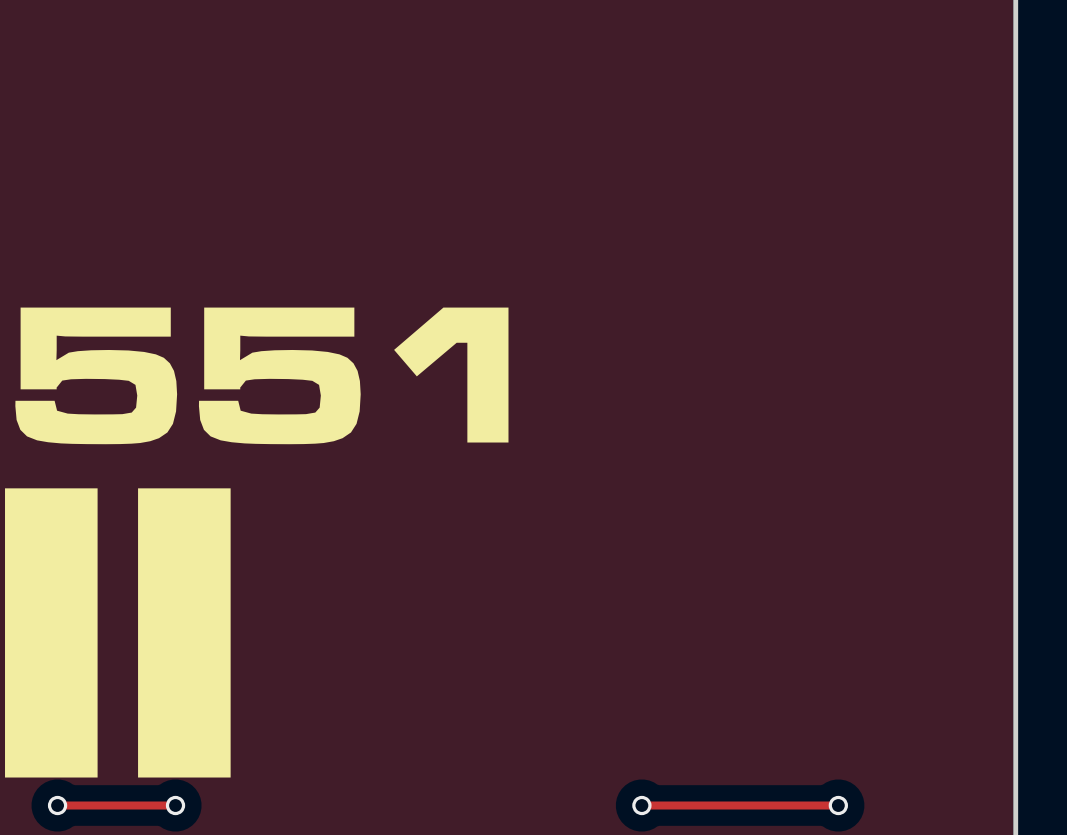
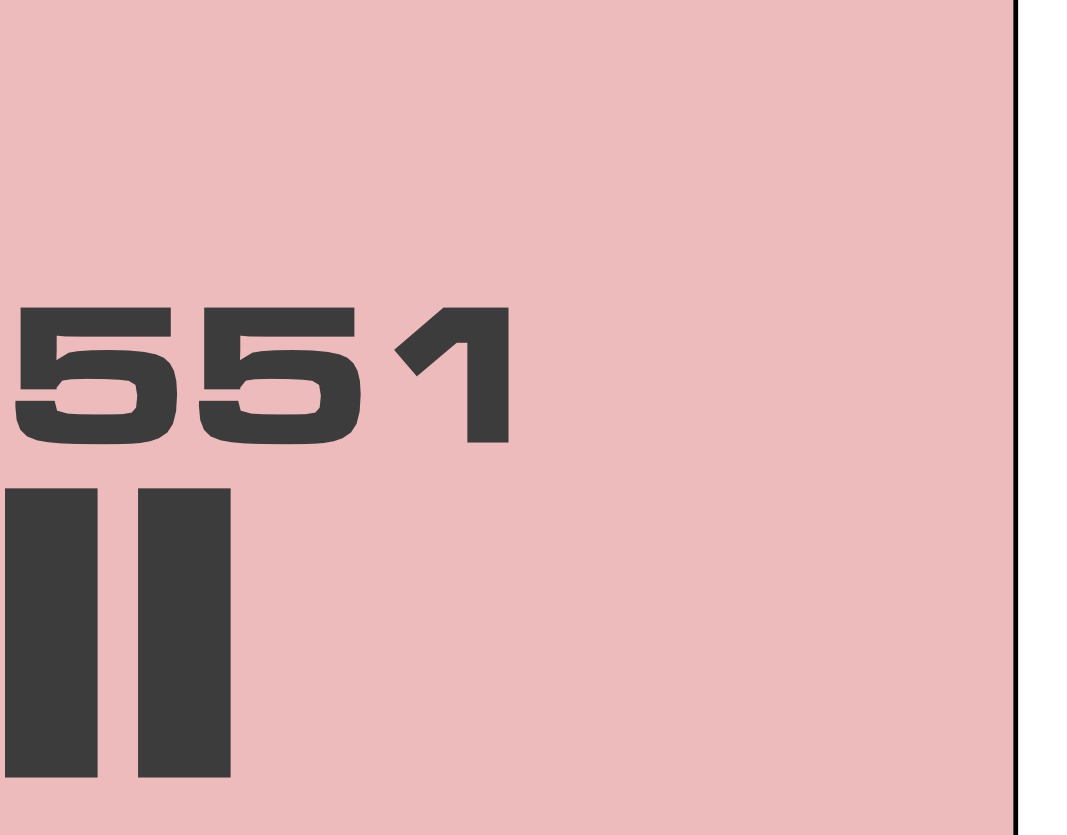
track: (57, 805) (175, 805) -> none
via: (57, 805) -> none
via: (175, 805) -> none
track: (641, 805) (838, 805) -> none
via: (641, 805) -> none
via: (838, 805) -> none

